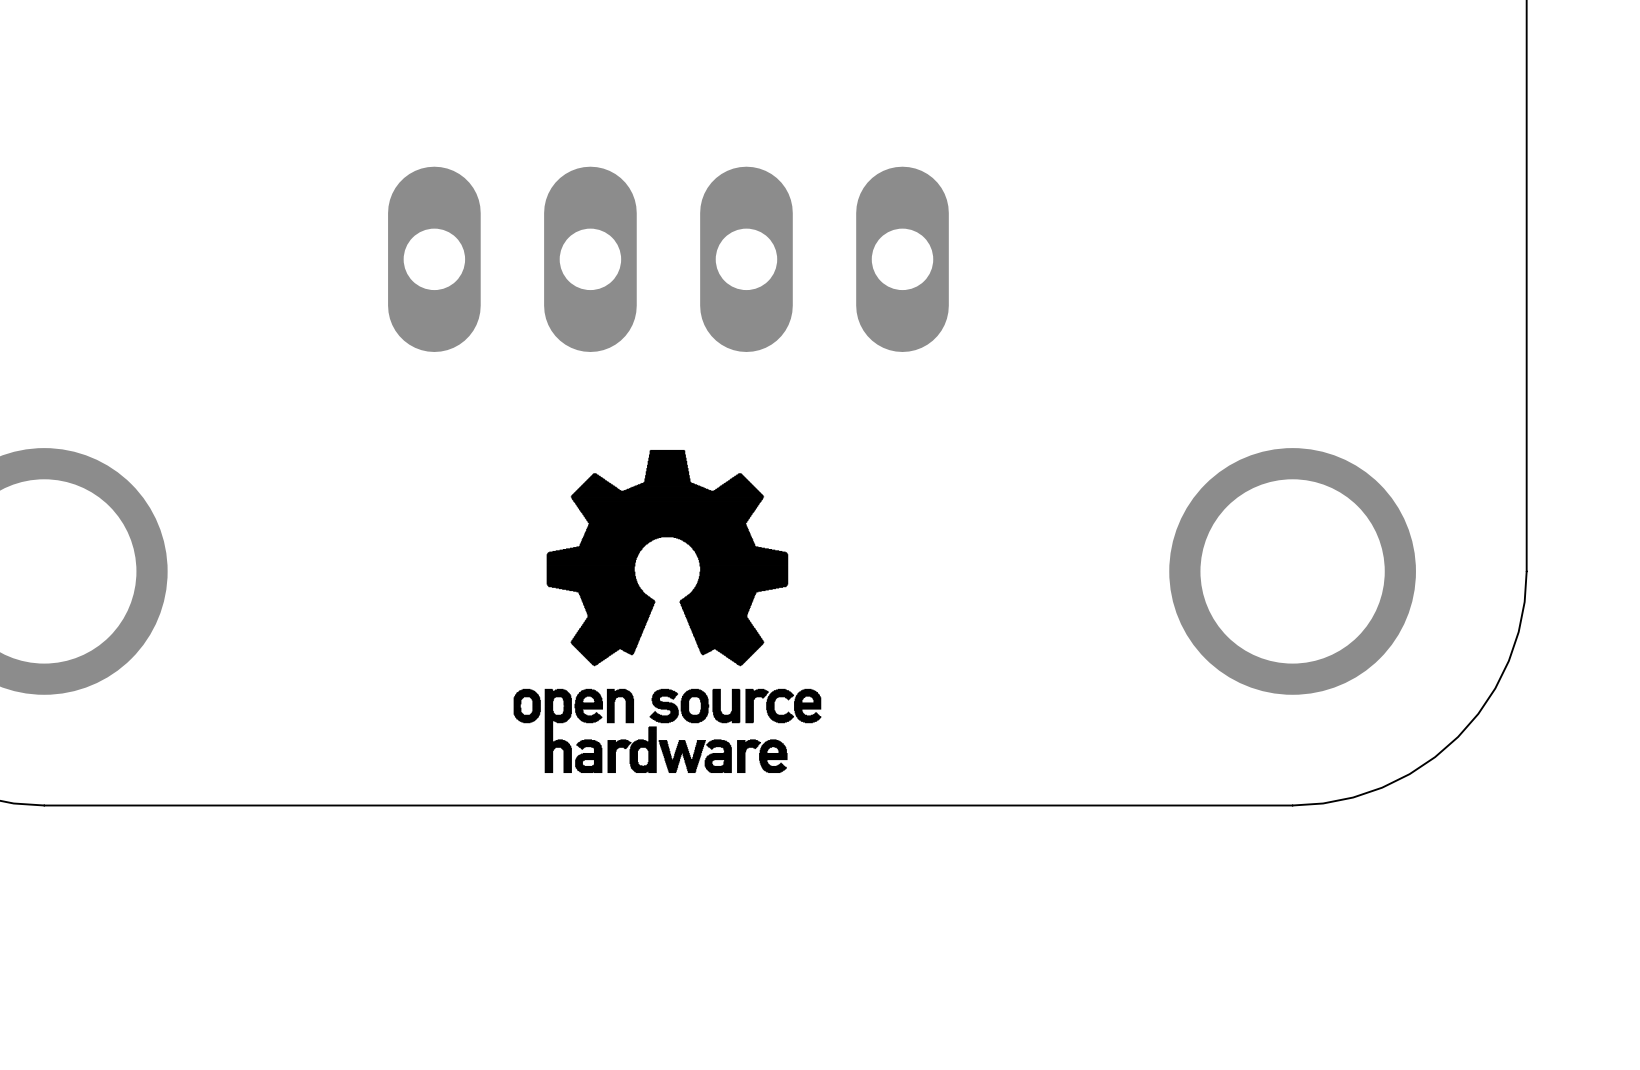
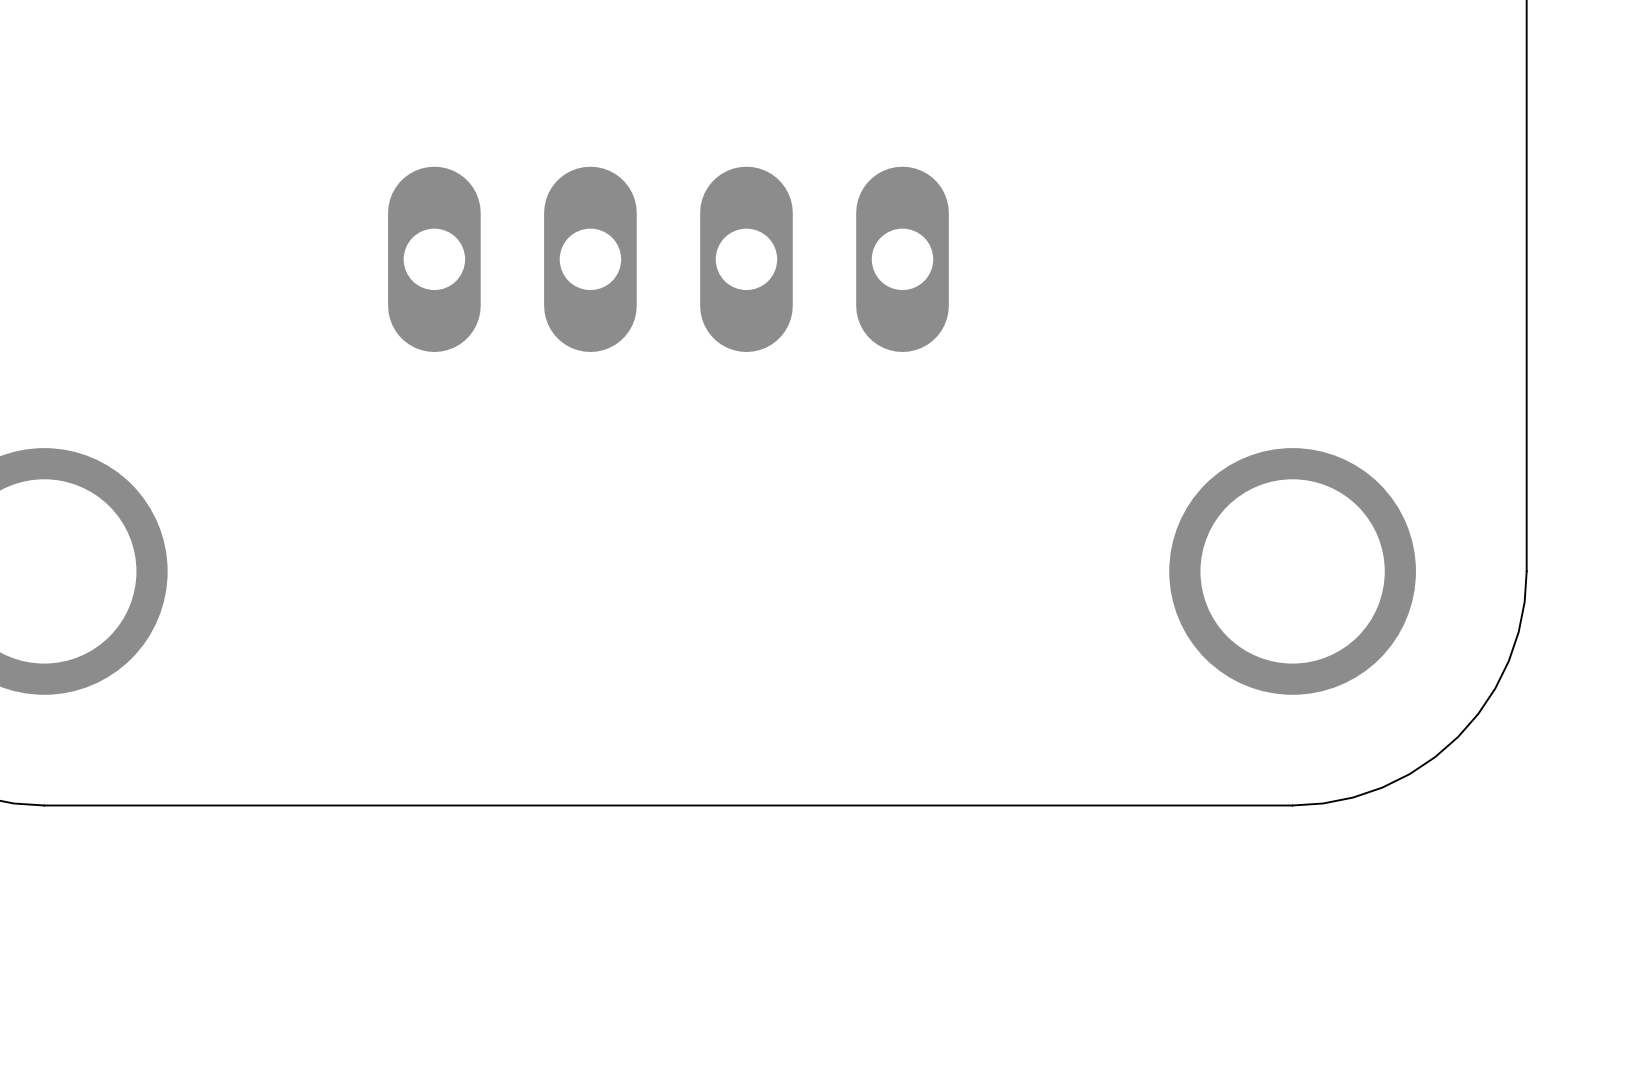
drawing: [513, 449, 822, 774] -> none

